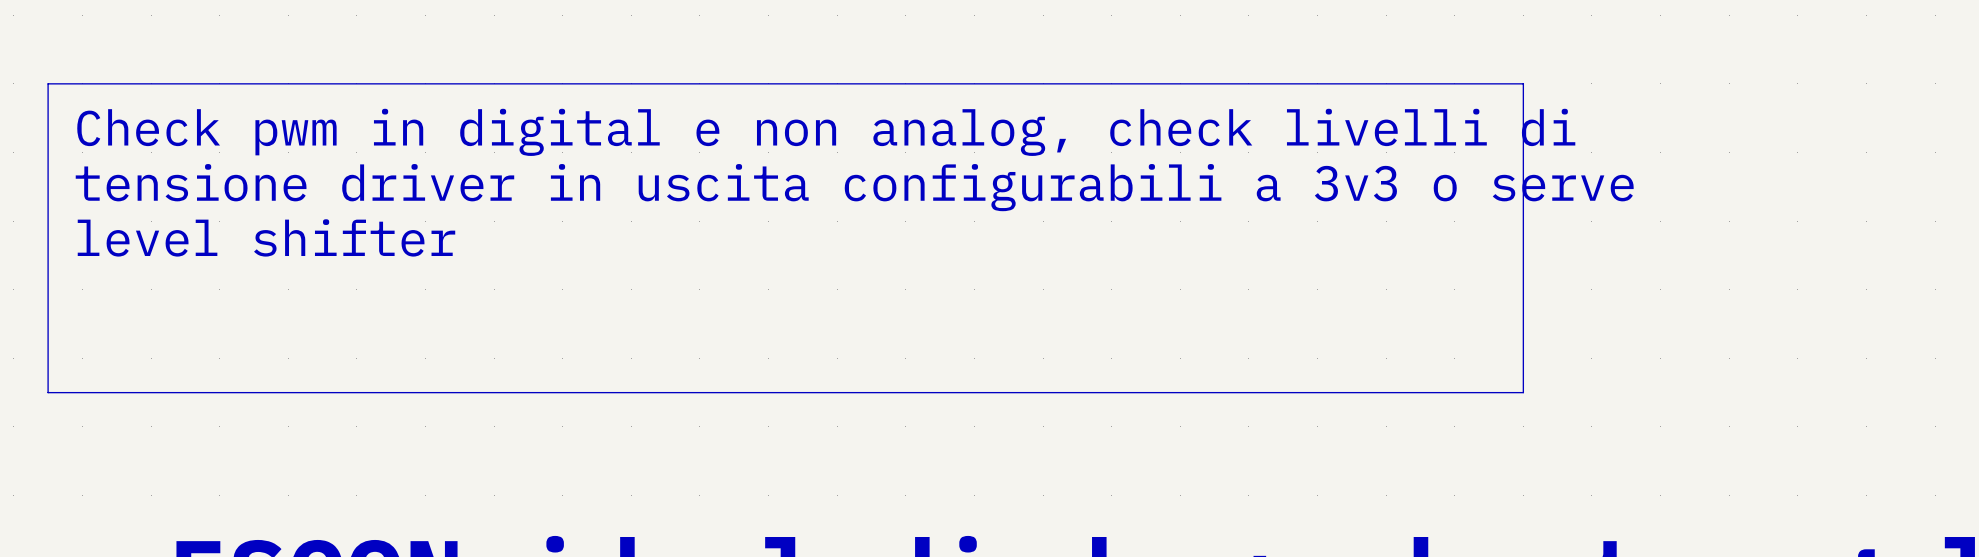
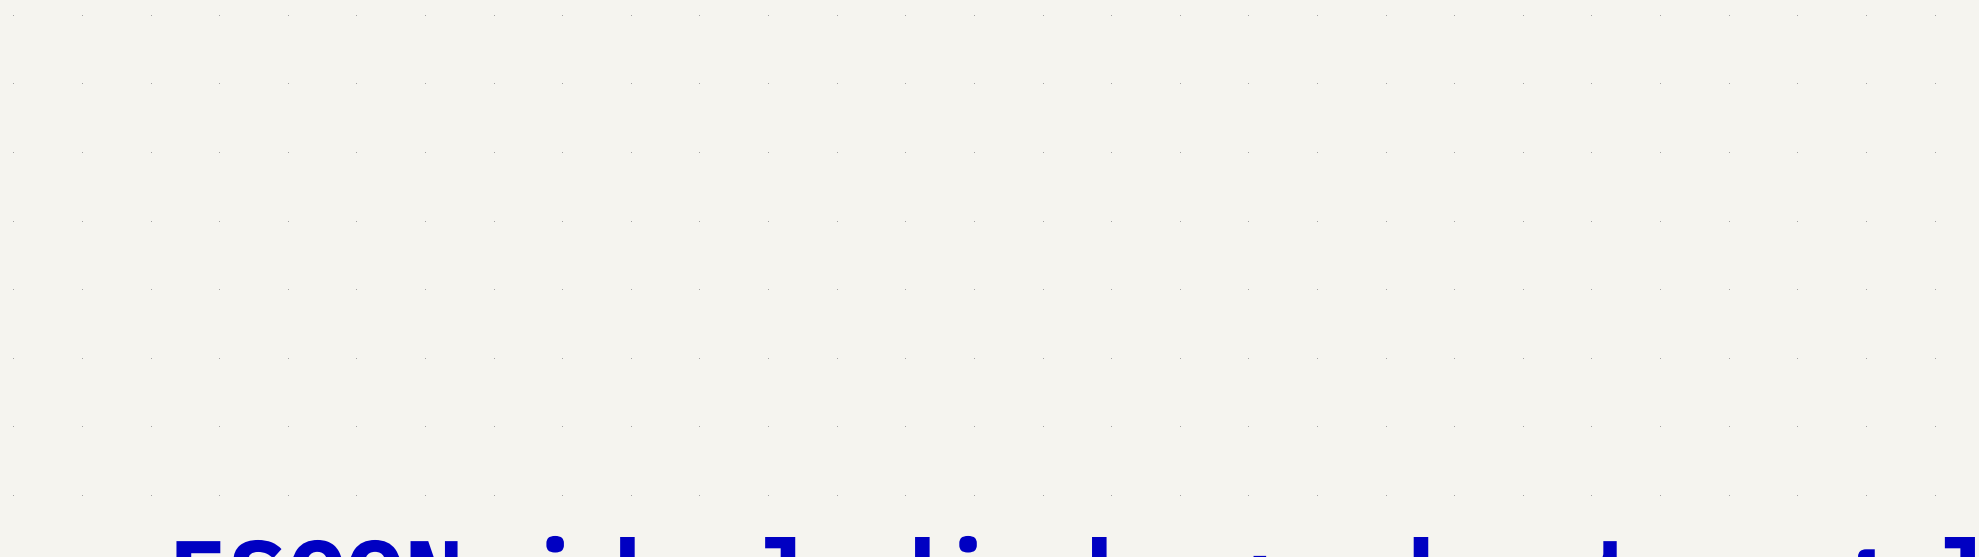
line: (48, 83) (1523, 83) (1523, 392) (48, 392) (48, 83) -> none
text: Check pwm in digital e non analog, check livelli di (826, 132) -> none
text: tensione driver in uscita configurabili a 3v3 o serve (854, 187) -> none
text: level shifter (266, 237) -> none

